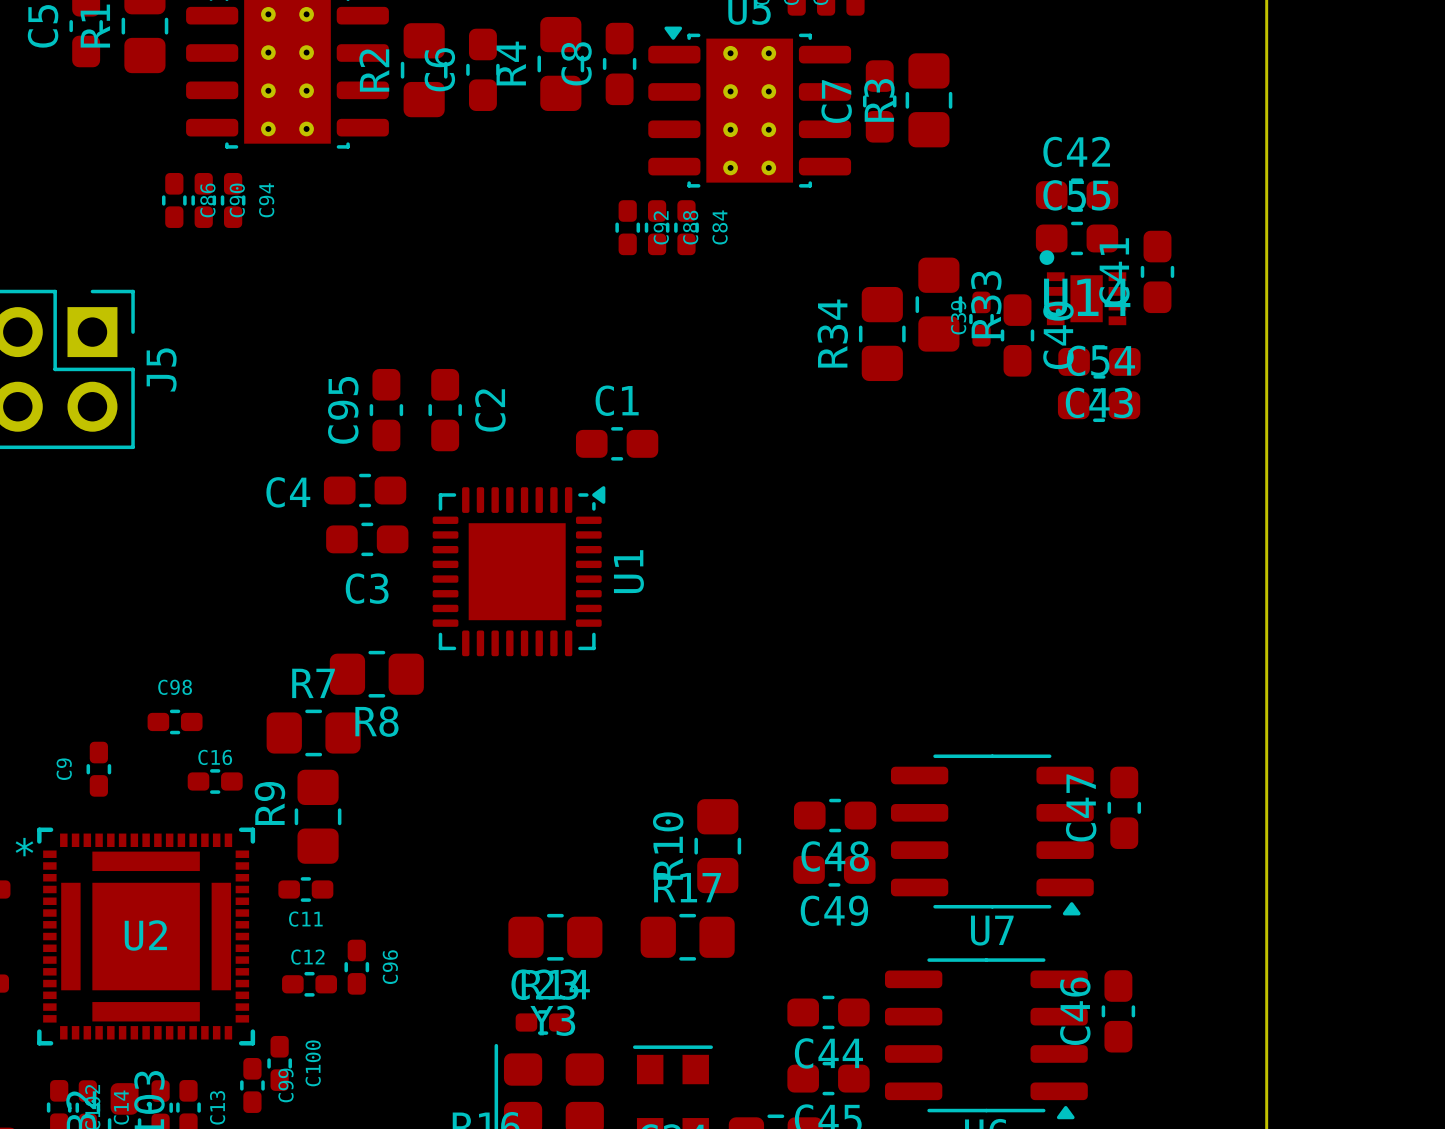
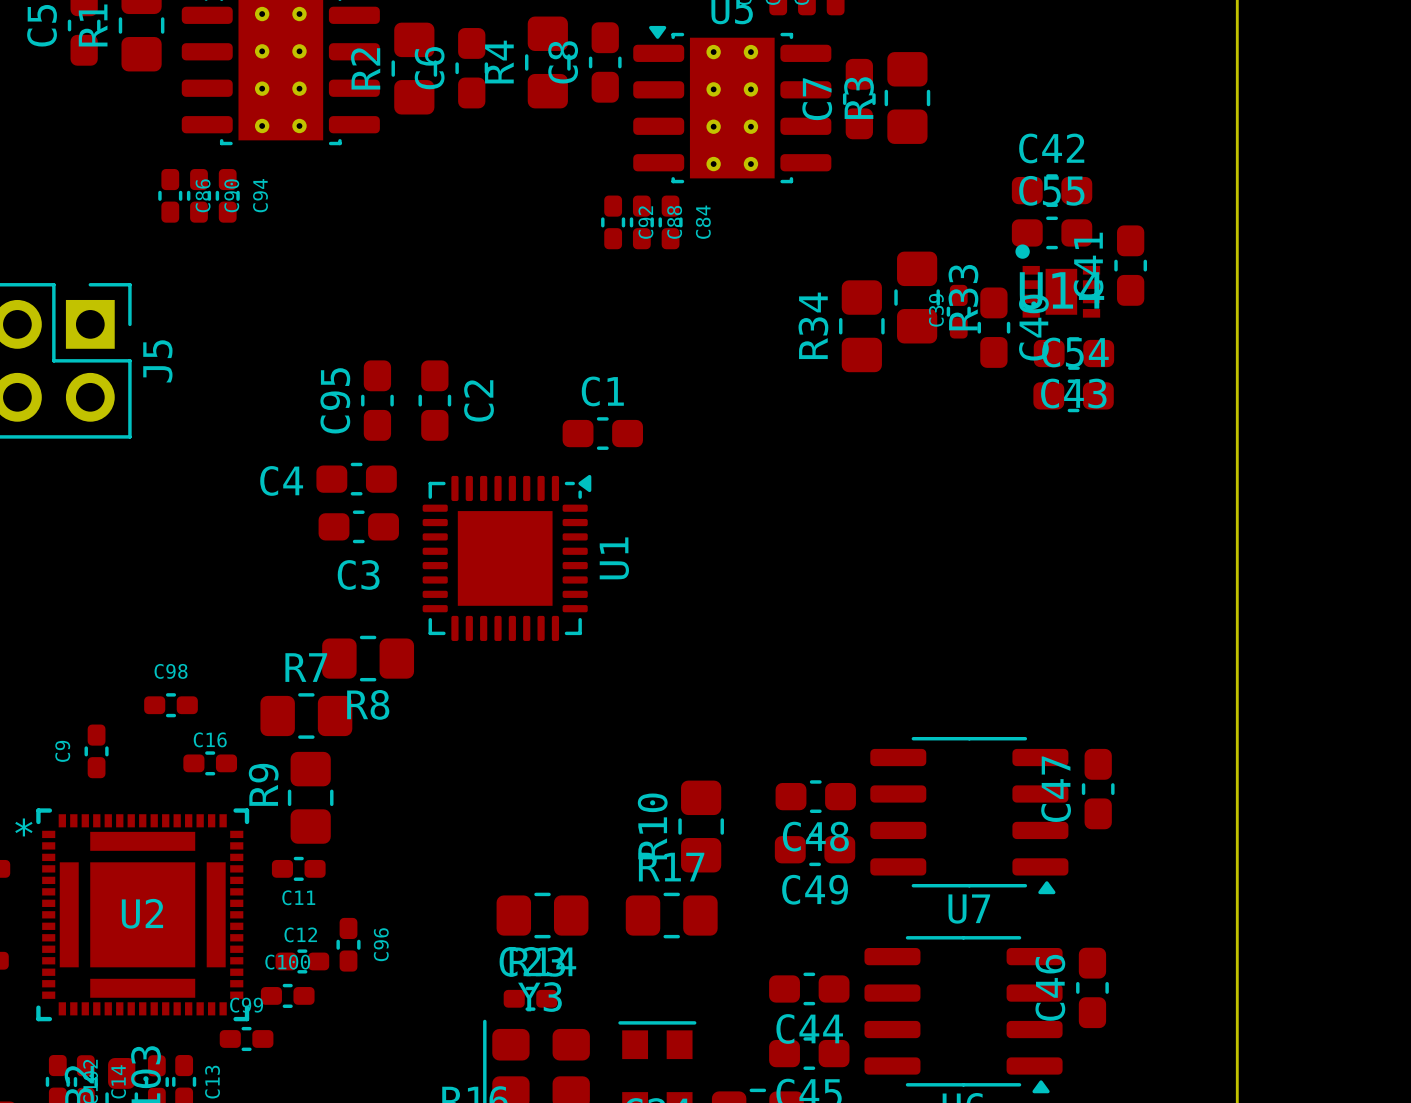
C100 rotation: 0° (279, 1063) -> 90° clockwise (287, 995)
C100 position: (279, 1063) -> (287, 995)
C99 rotation: 0° (252, 1085) -> 90° clockwise (246, 1038)

